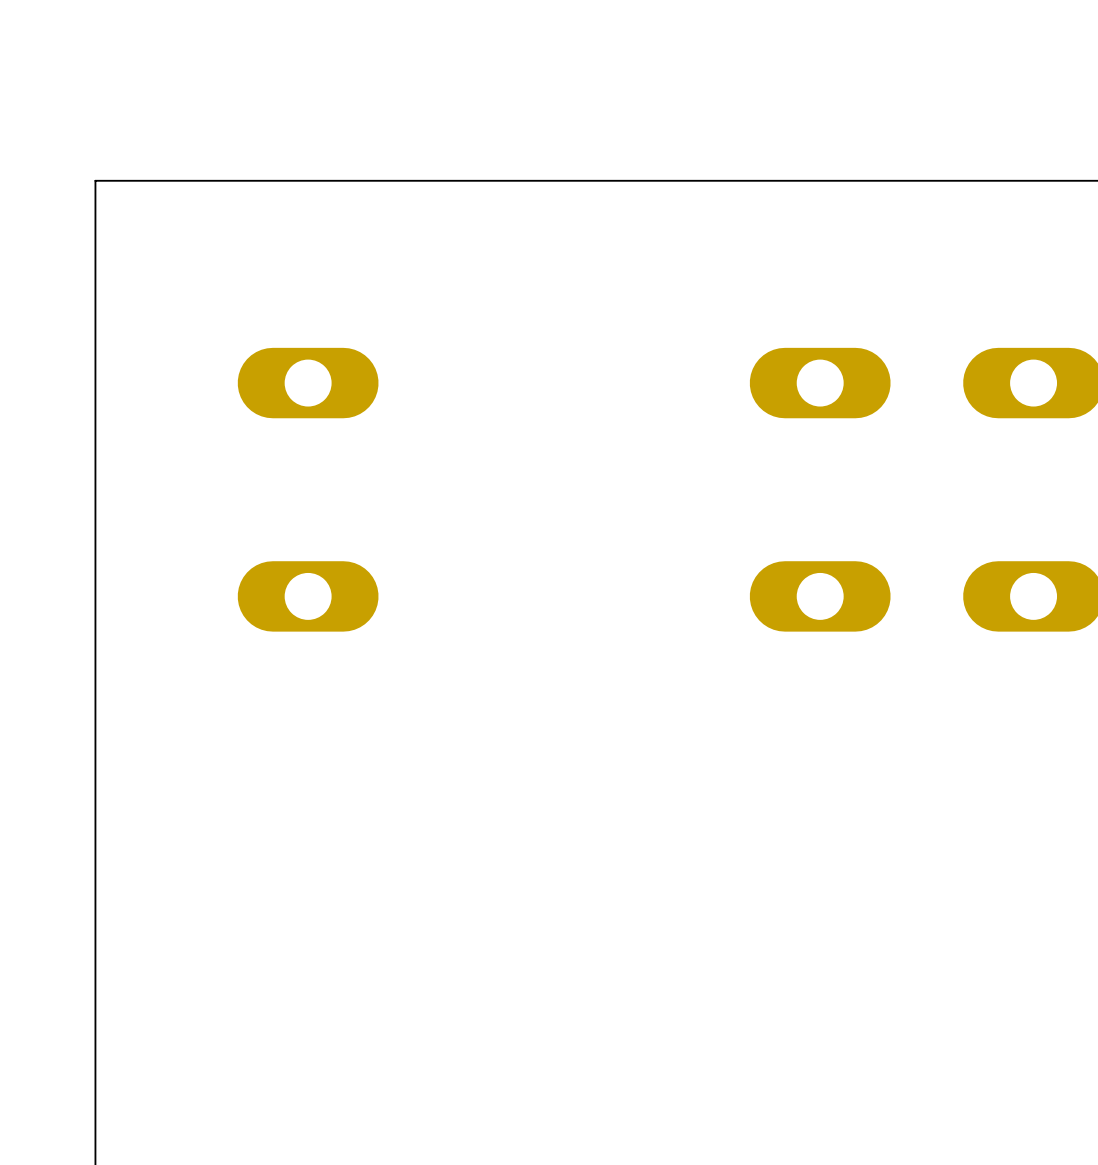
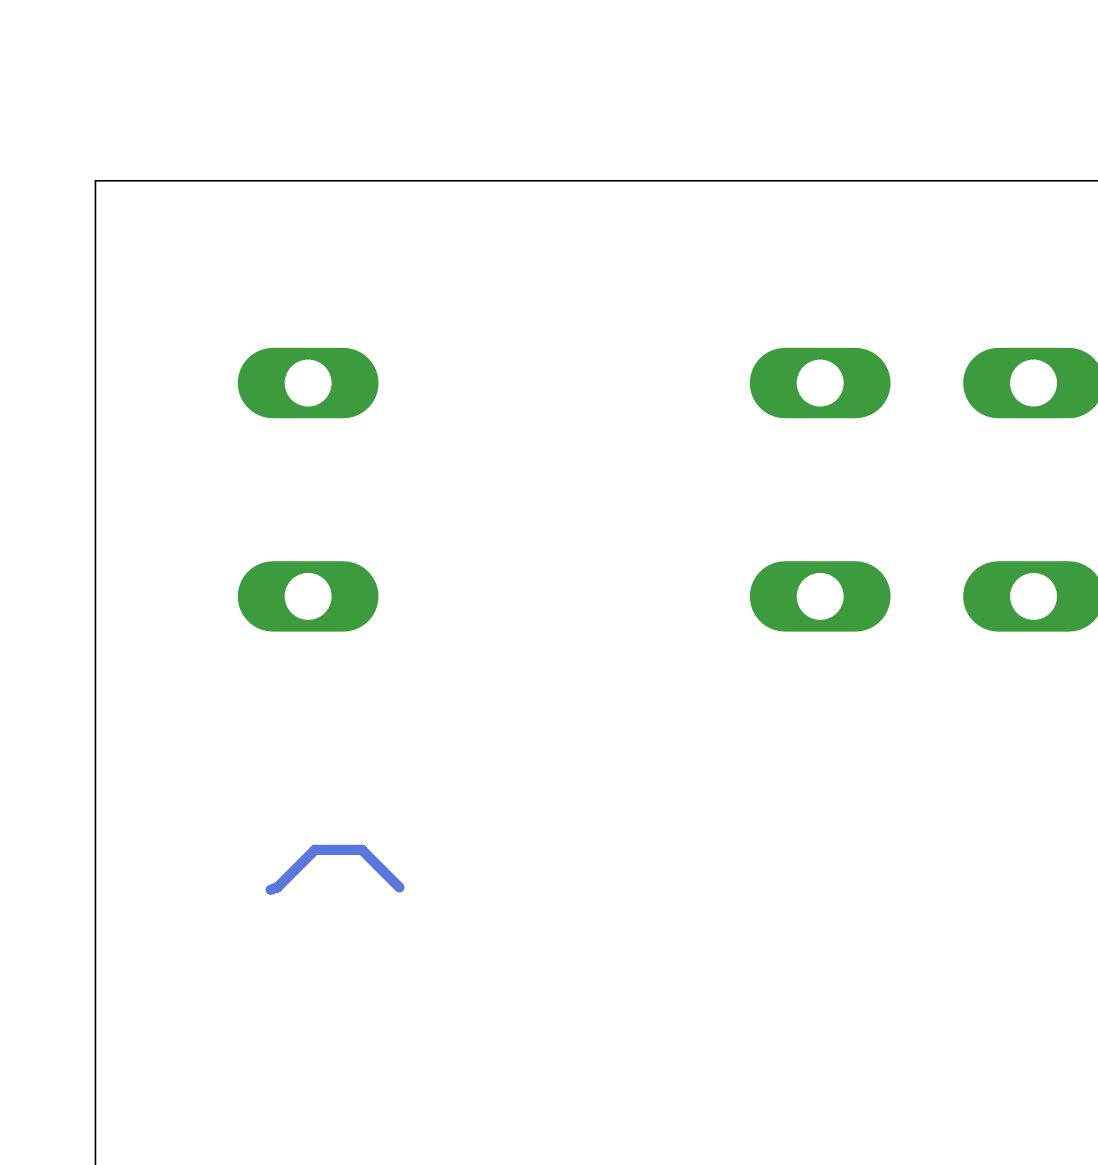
track: none -> (399, 887) (361, 849) (314, 849) (277, 887) (270, 889)

